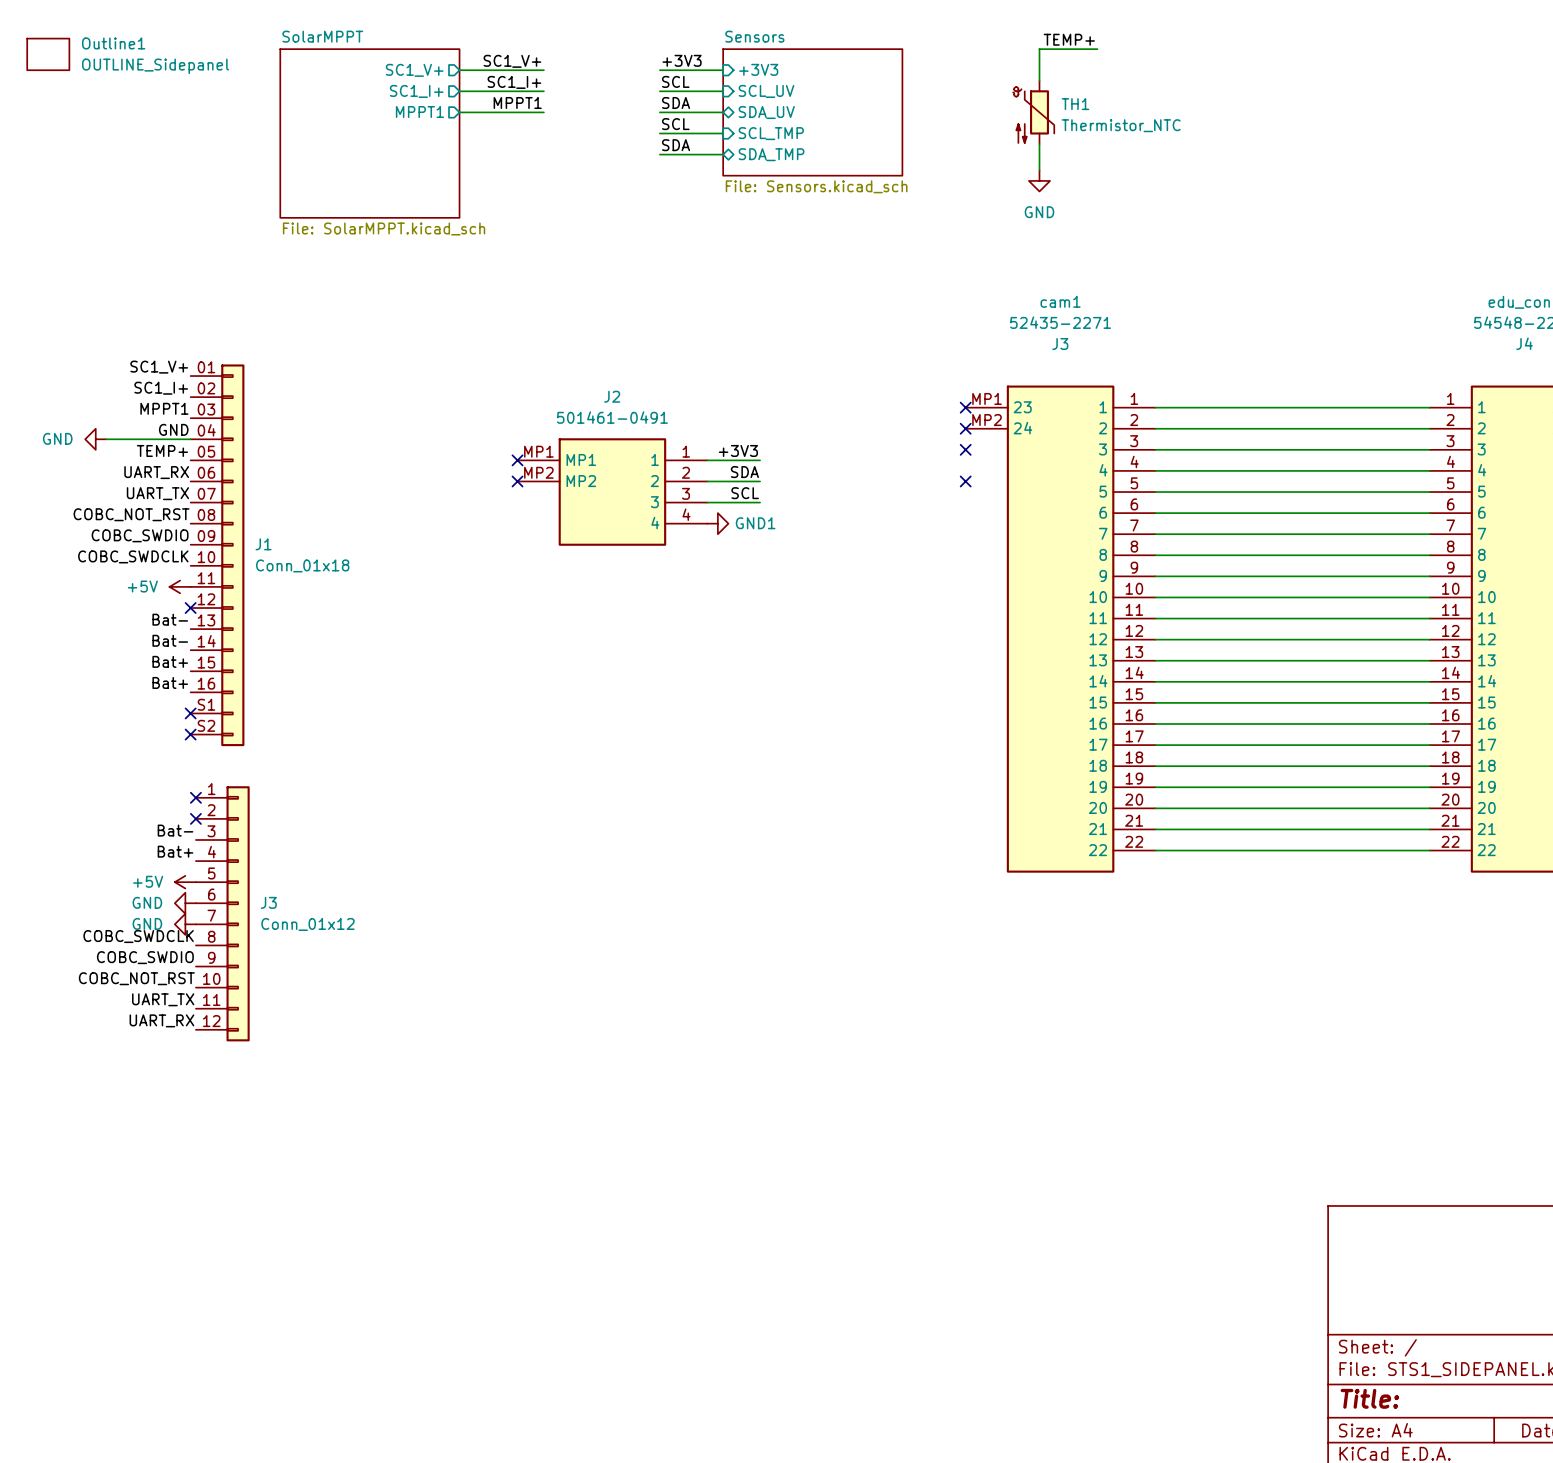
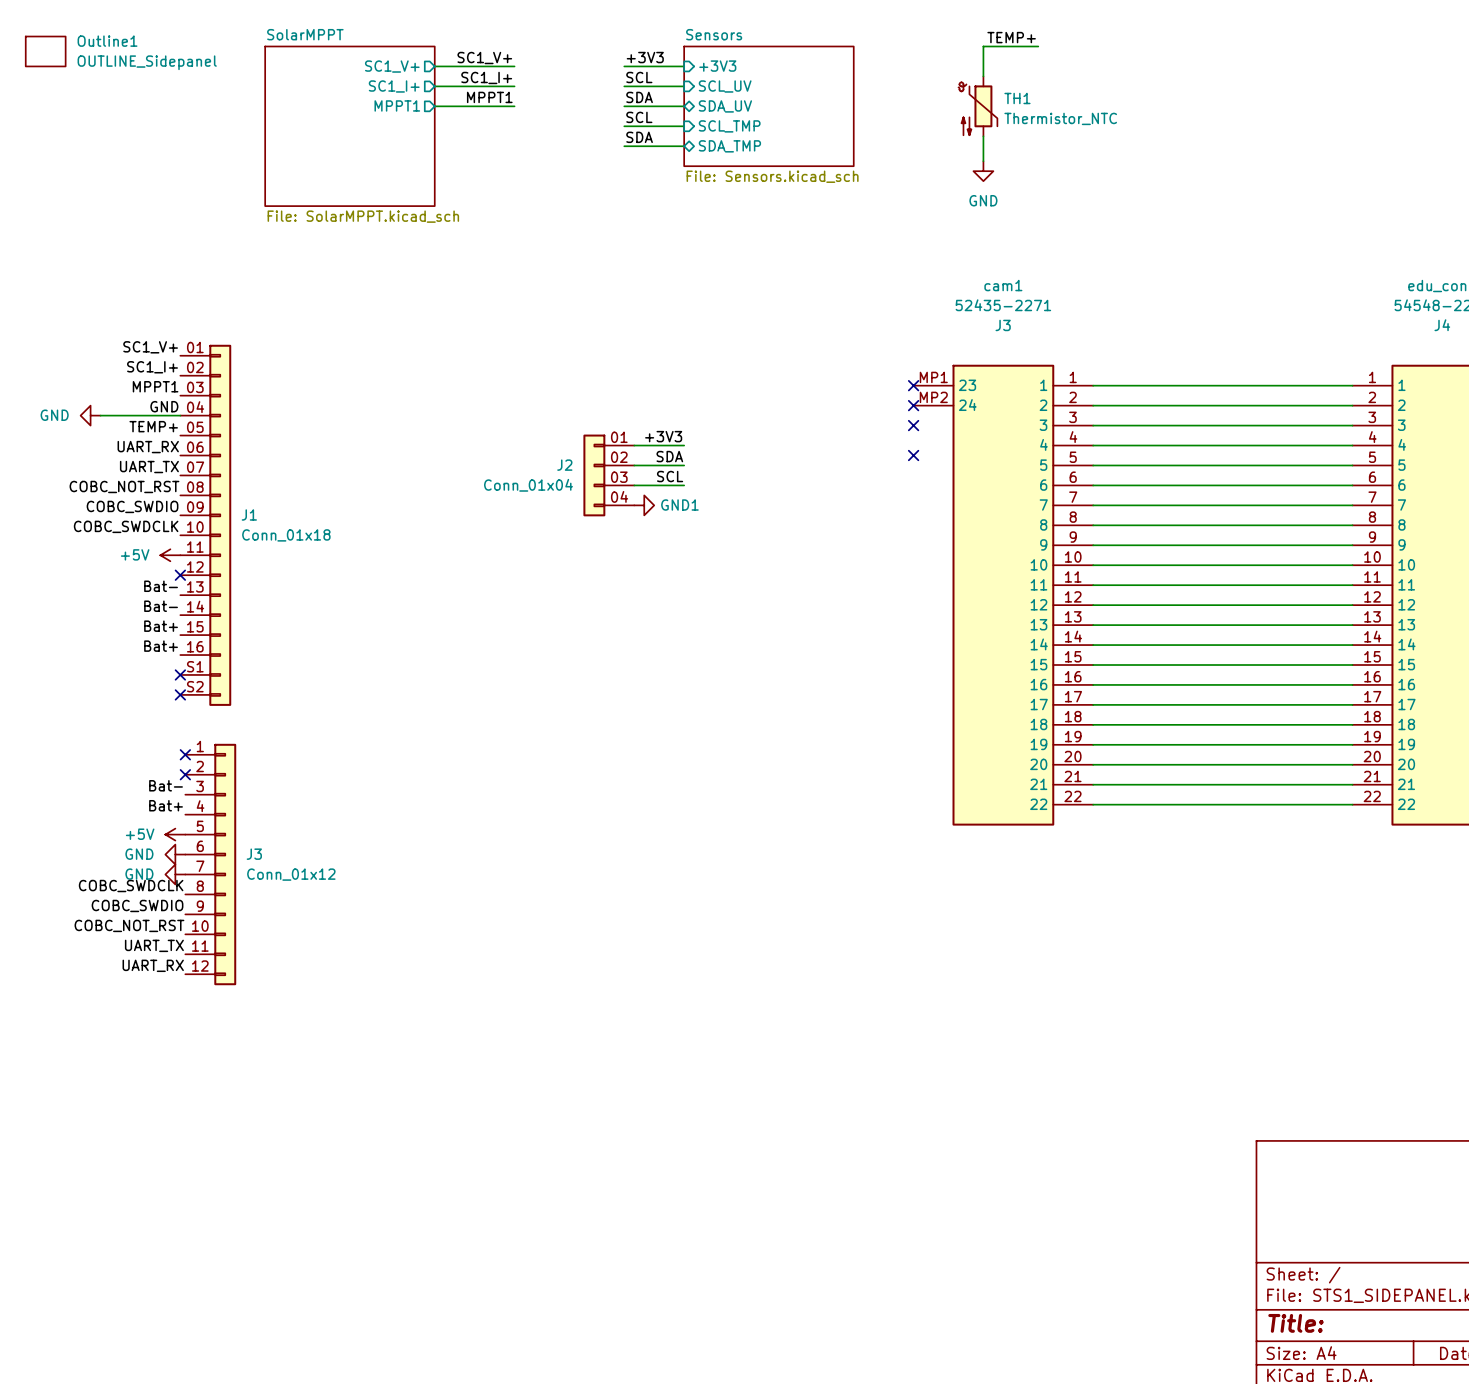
label position: +3V3 (738, 450) -> +3V3 (663, 436)
no-connect mark: (517, 460) -> none
wire: (707, 460) (760, 460) -> (634, 445) (684, 445)
label position: SDA (744, 472) -> SDA (669, 456)
no-connect mark: (517, 481) -> none
wire: (707, 481) (760, 481) -> (634, 485) (684, 485)
part: (612, 492) -> none
label position: SCL (745, 493) -> SCL (670, 476)
J2: none -> Conn_01x04 (608, 475)
wire: (707, 502) (760, 502) -> (634, 465) (684, 465)
power symbol position: GND1 (717, 523) -> GND1 (644, 505)

